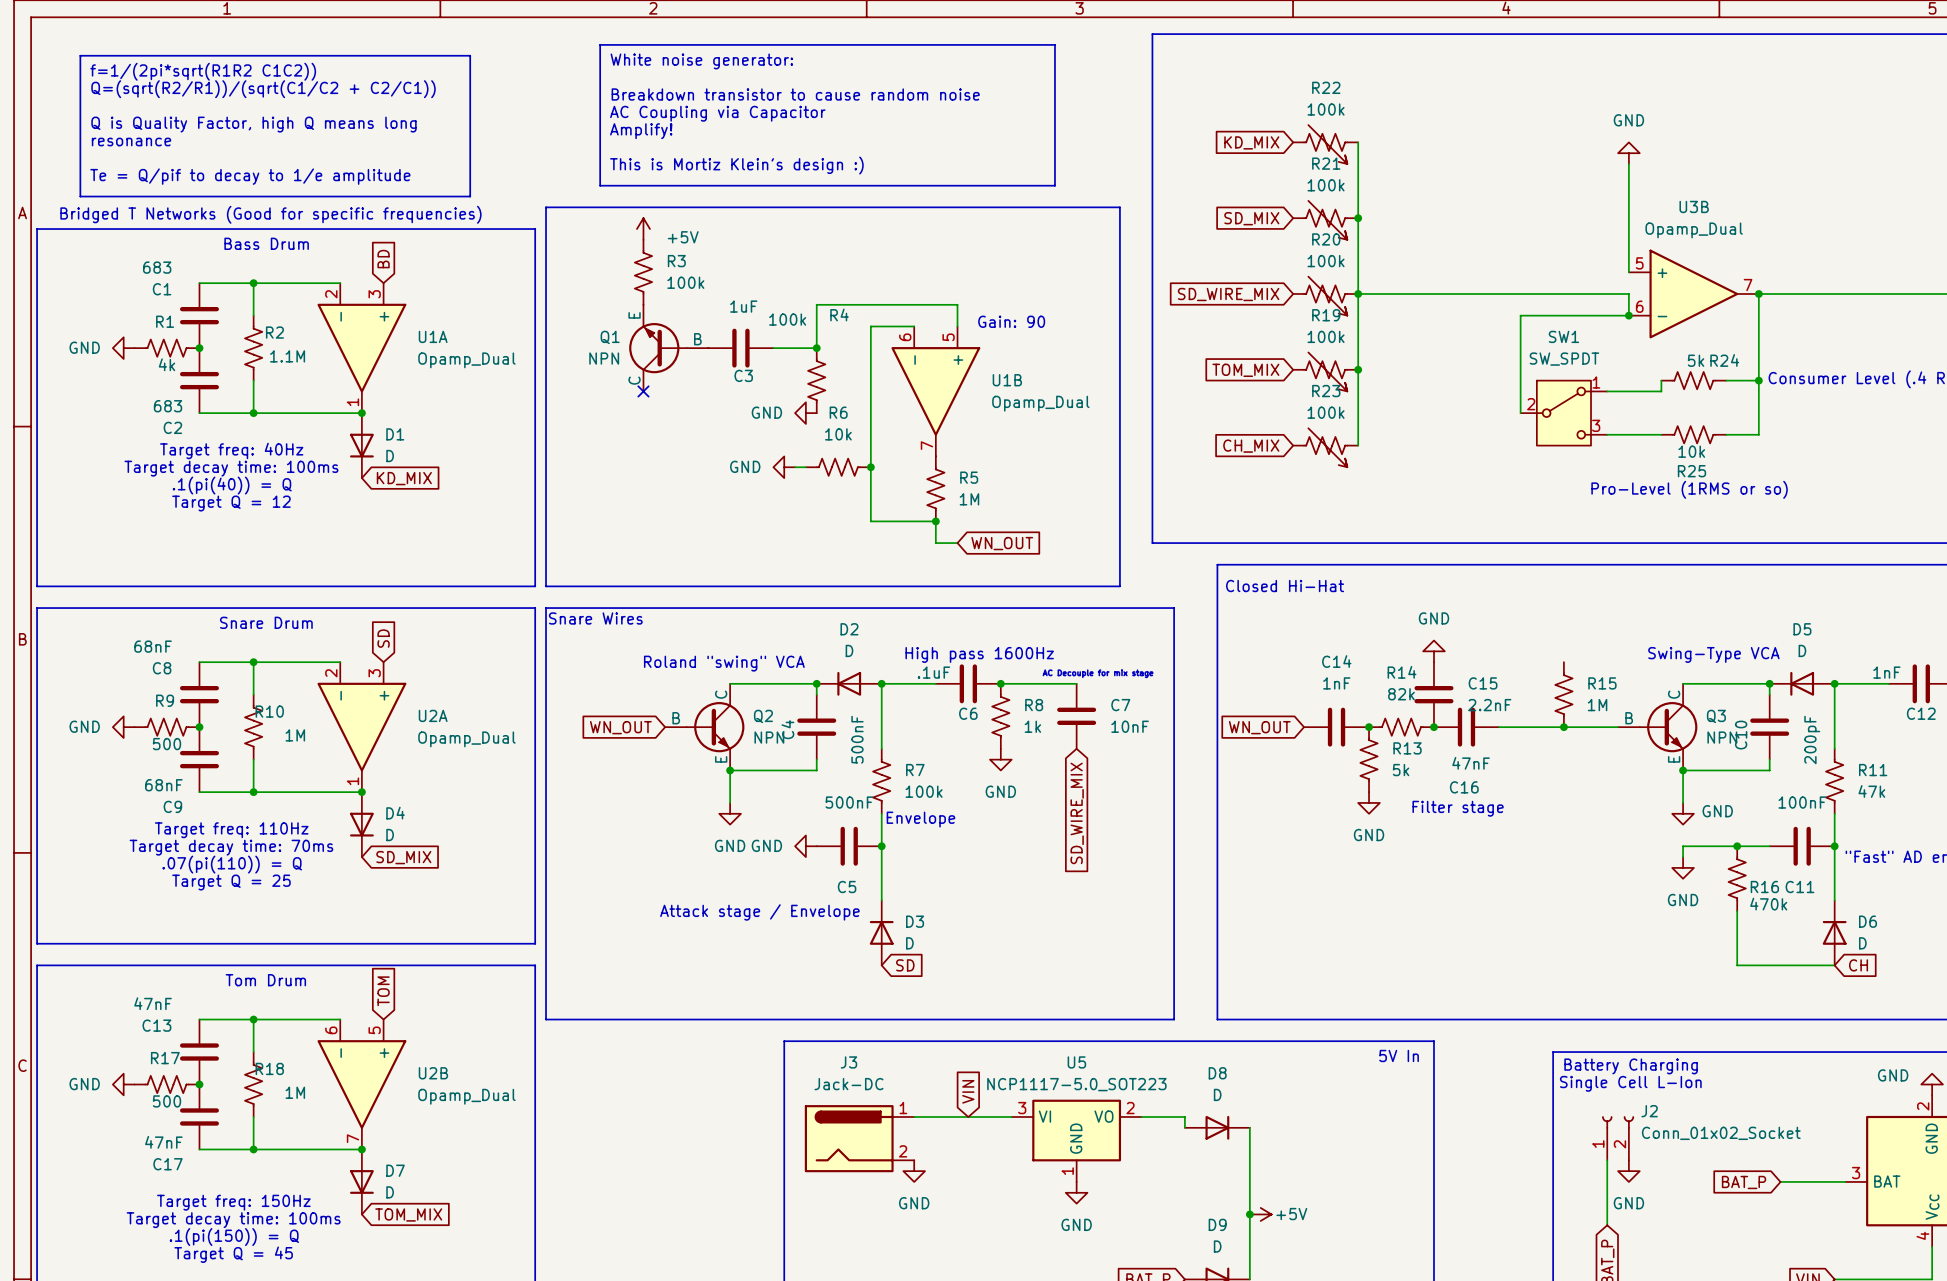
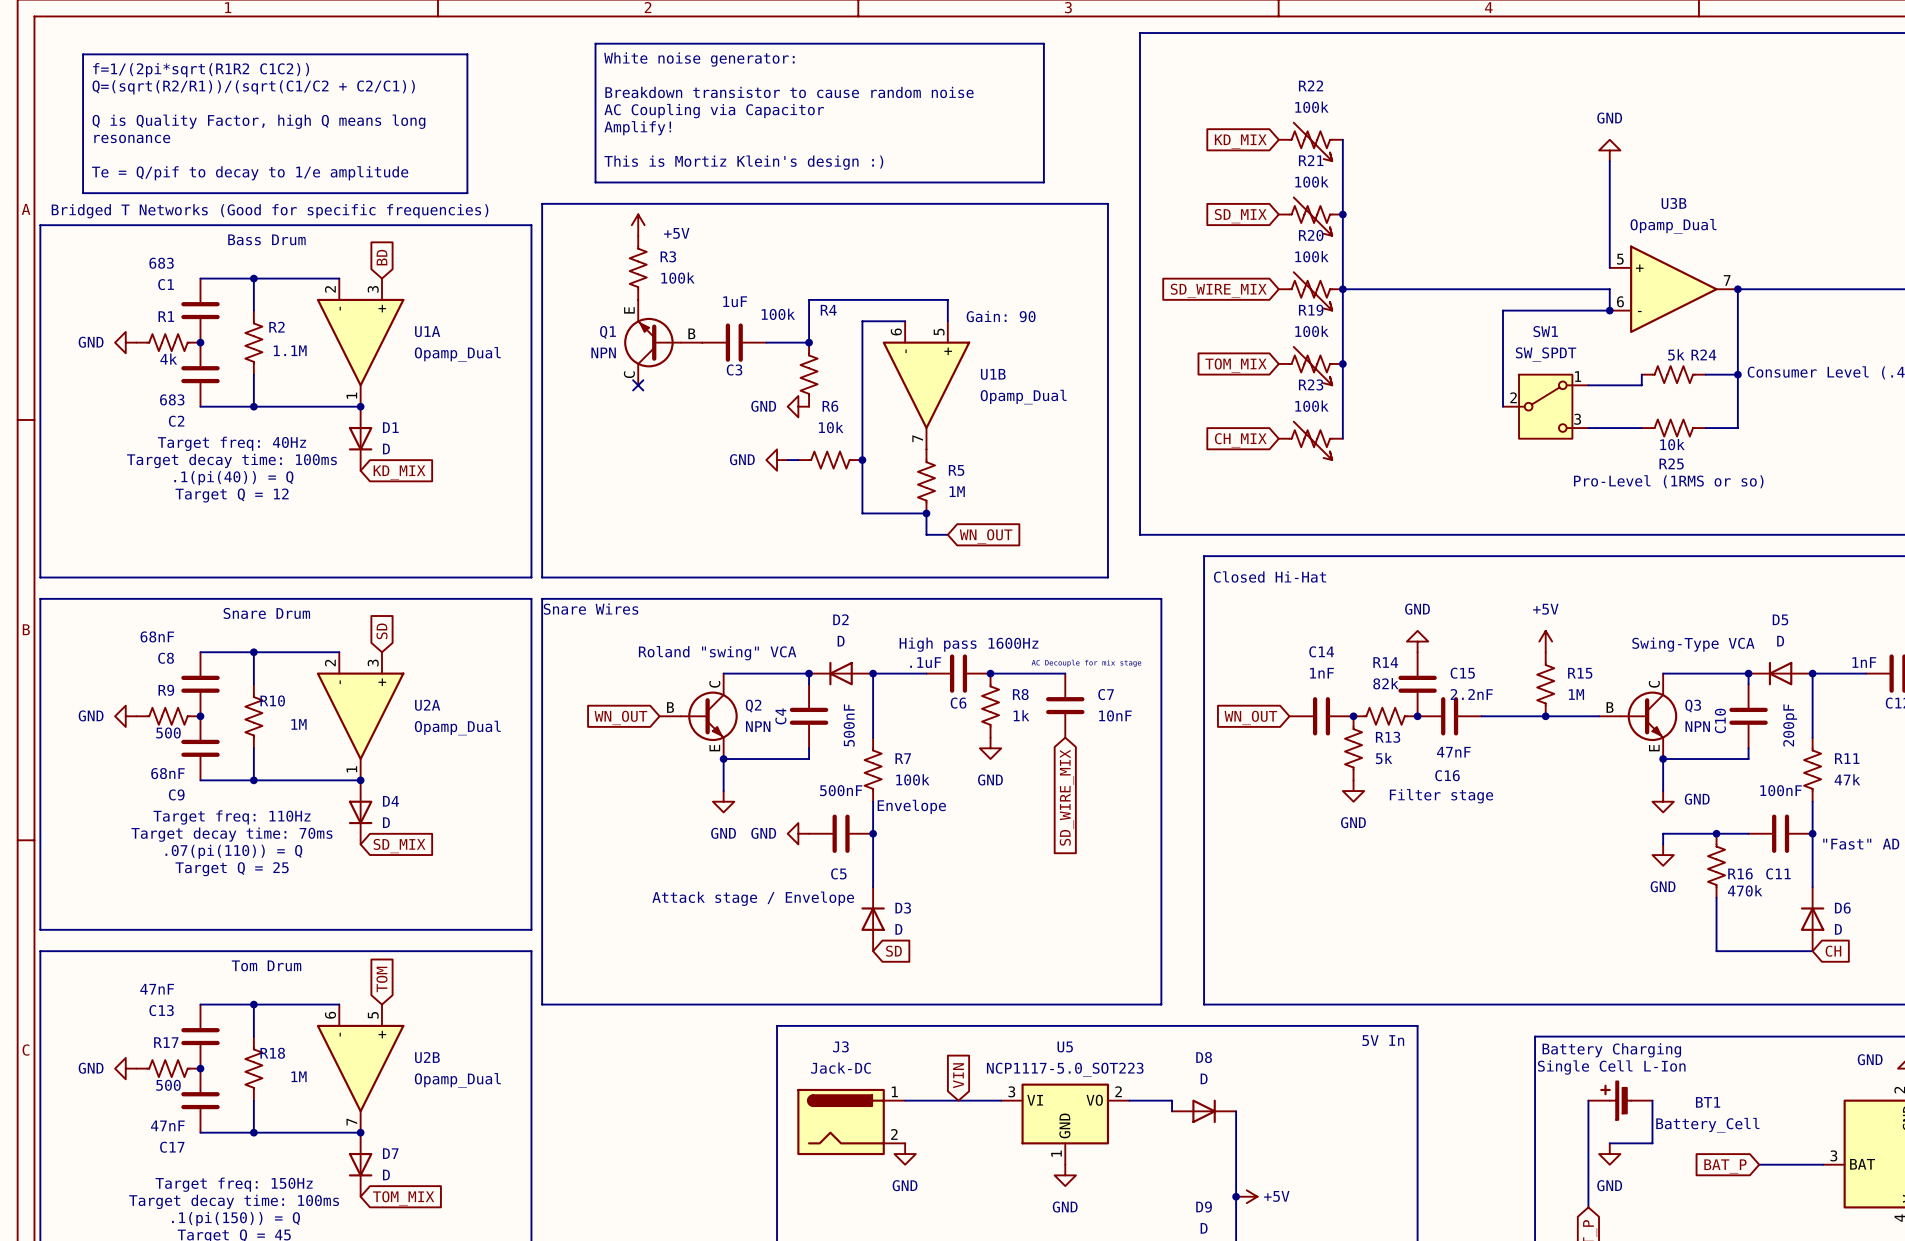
power symbol: none -> +5V (1545, 641)
BT1: none -> Battery_Cell (1620, 1100)
wire: none -> (1652, 1100) (1652, 1143) (1609, 1143)
J2: Conn_01x02_Socket (1618, 1138) -> none

